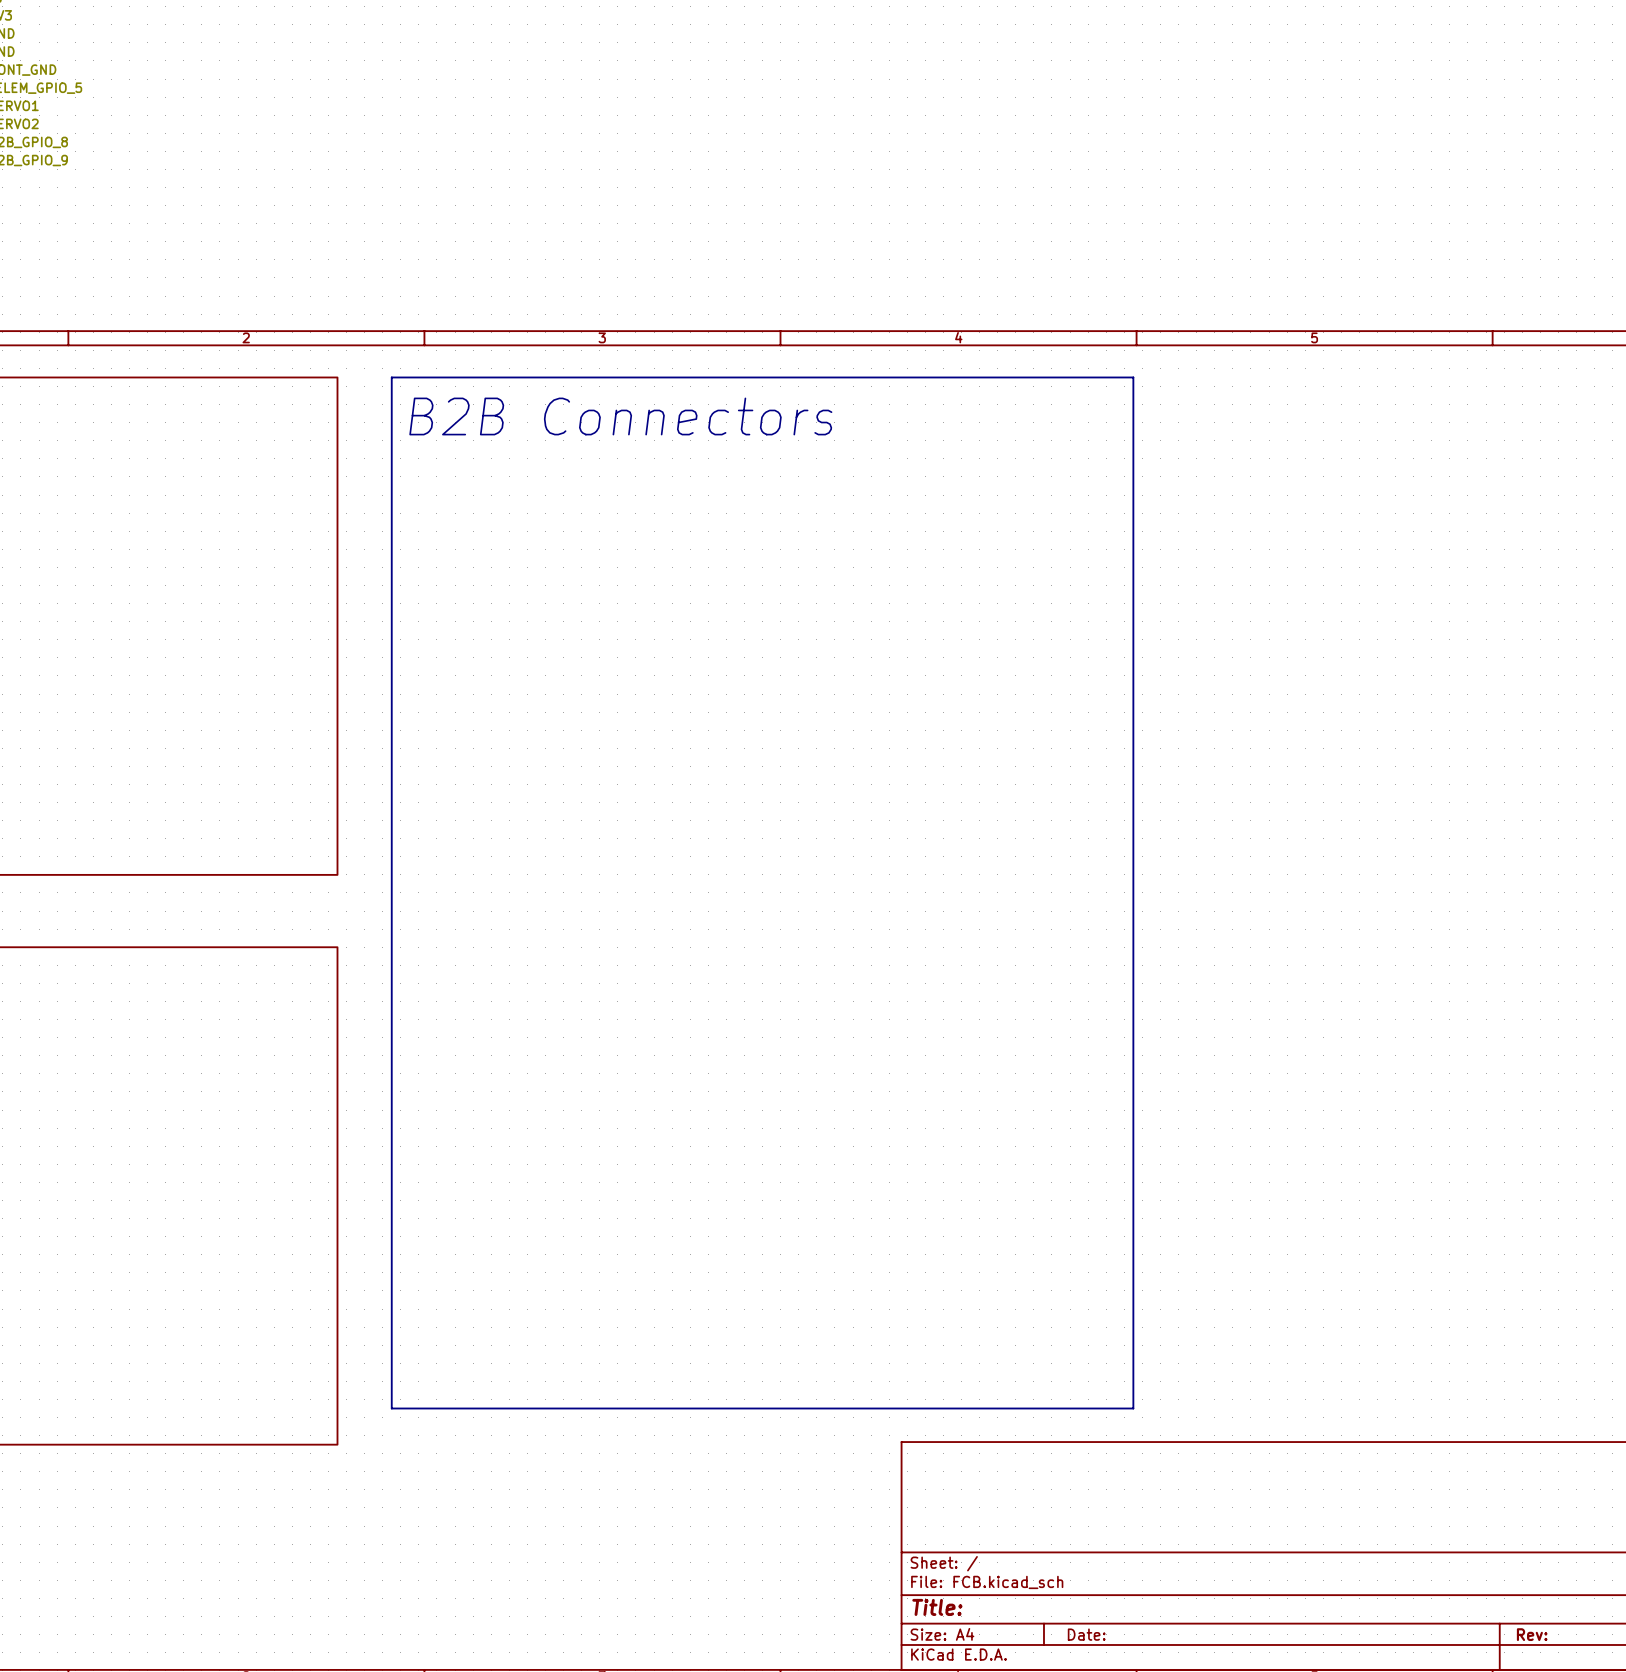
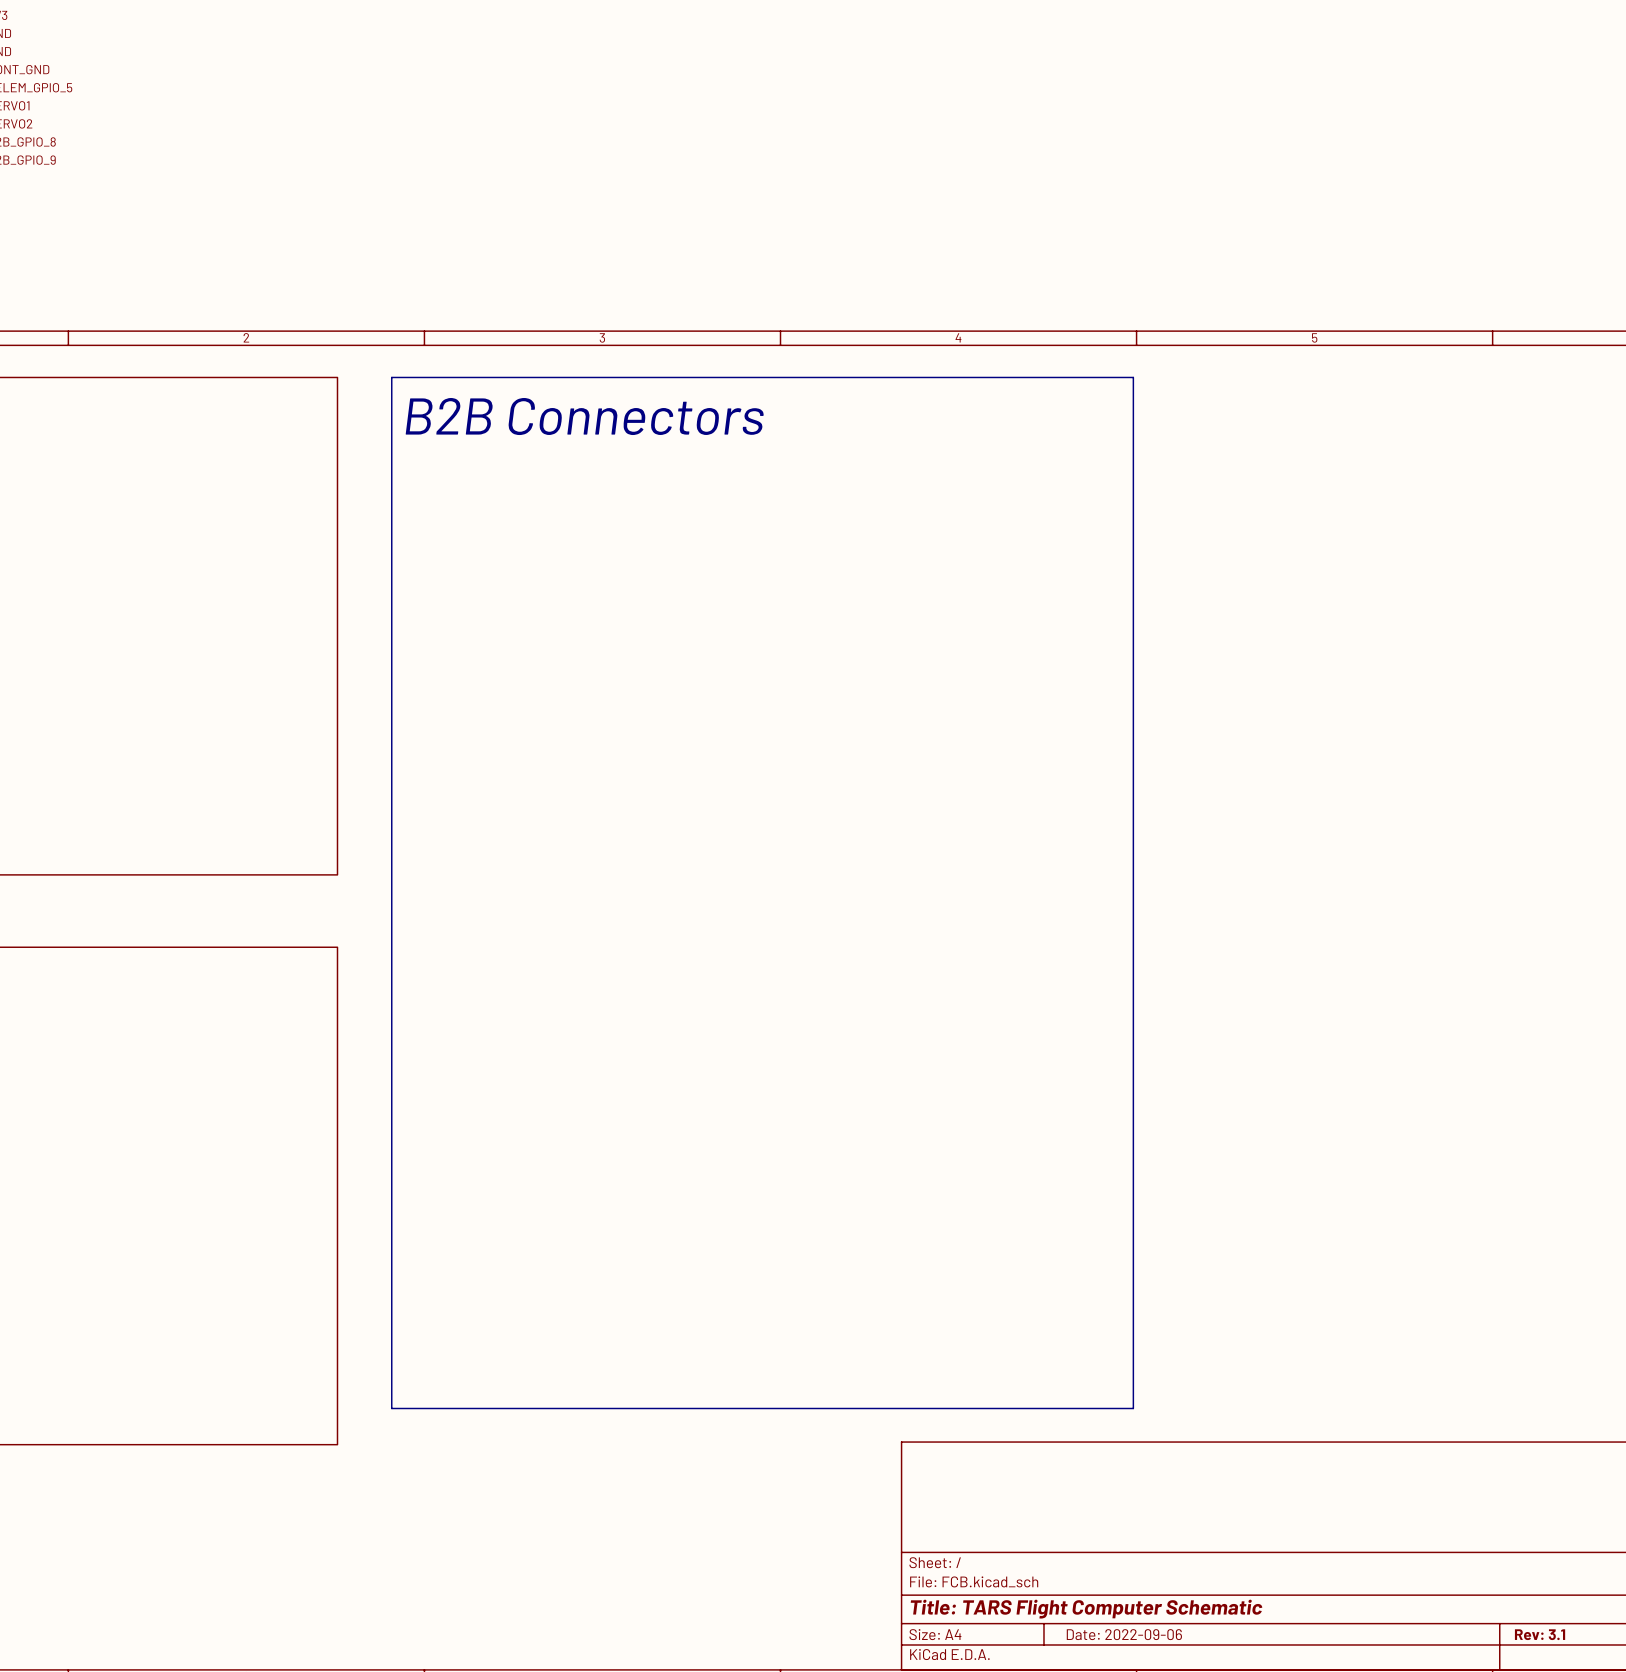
title block: Title: (937, 1607) -> Title: TARS Flight Computer Schematic (1086, 1609)
title block: Date: (1086, 1634) -> Date: 2022-09-06 (1124, 1634)
title block: Rev: (1532, 1634) -> Rev: 3.1 (1540, 1634)

